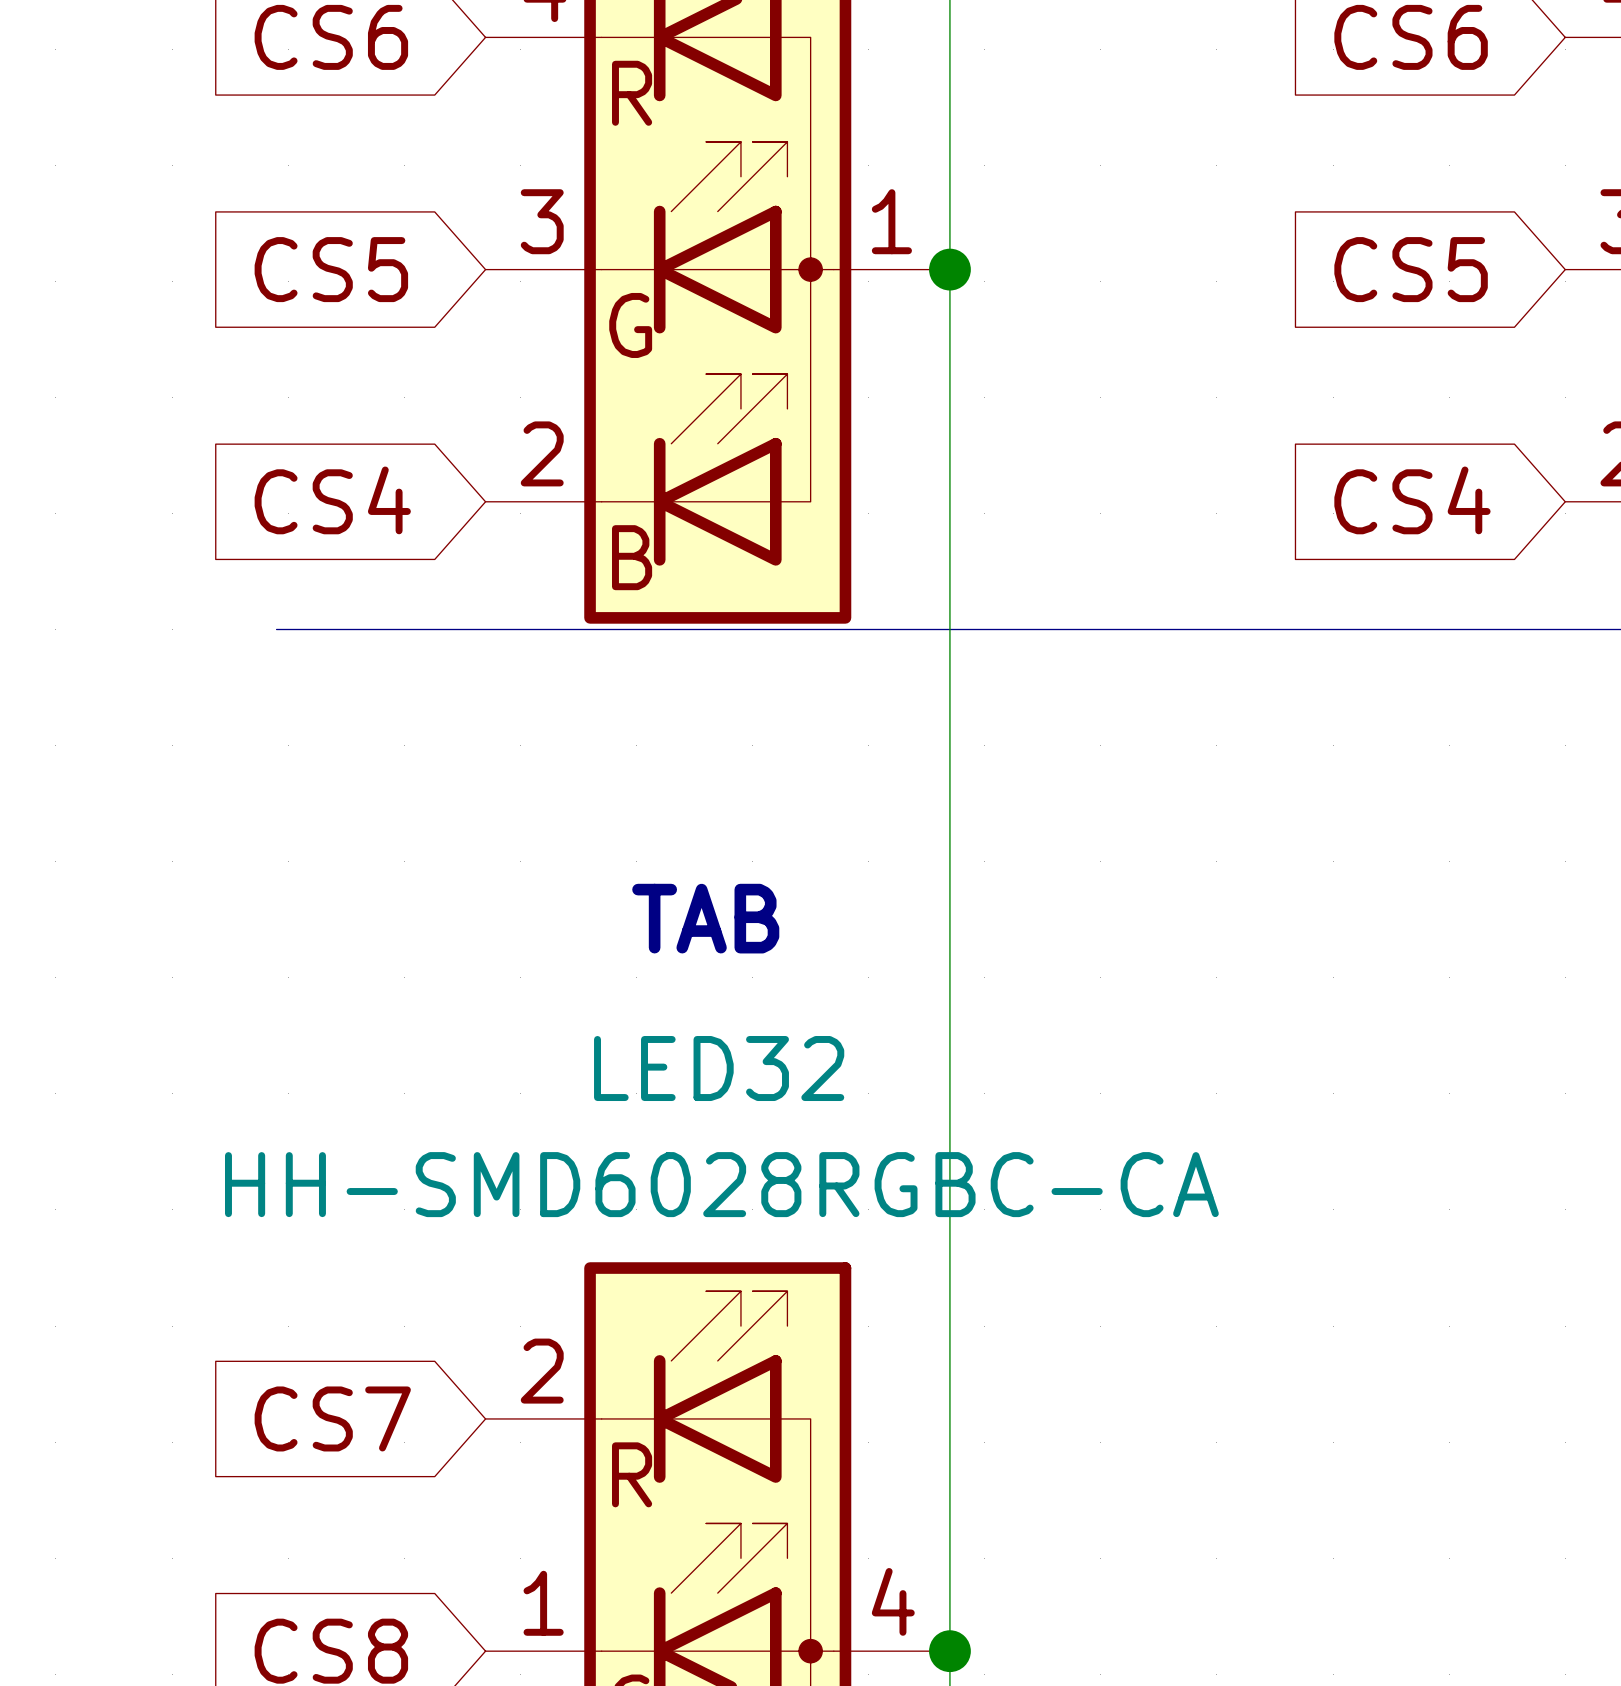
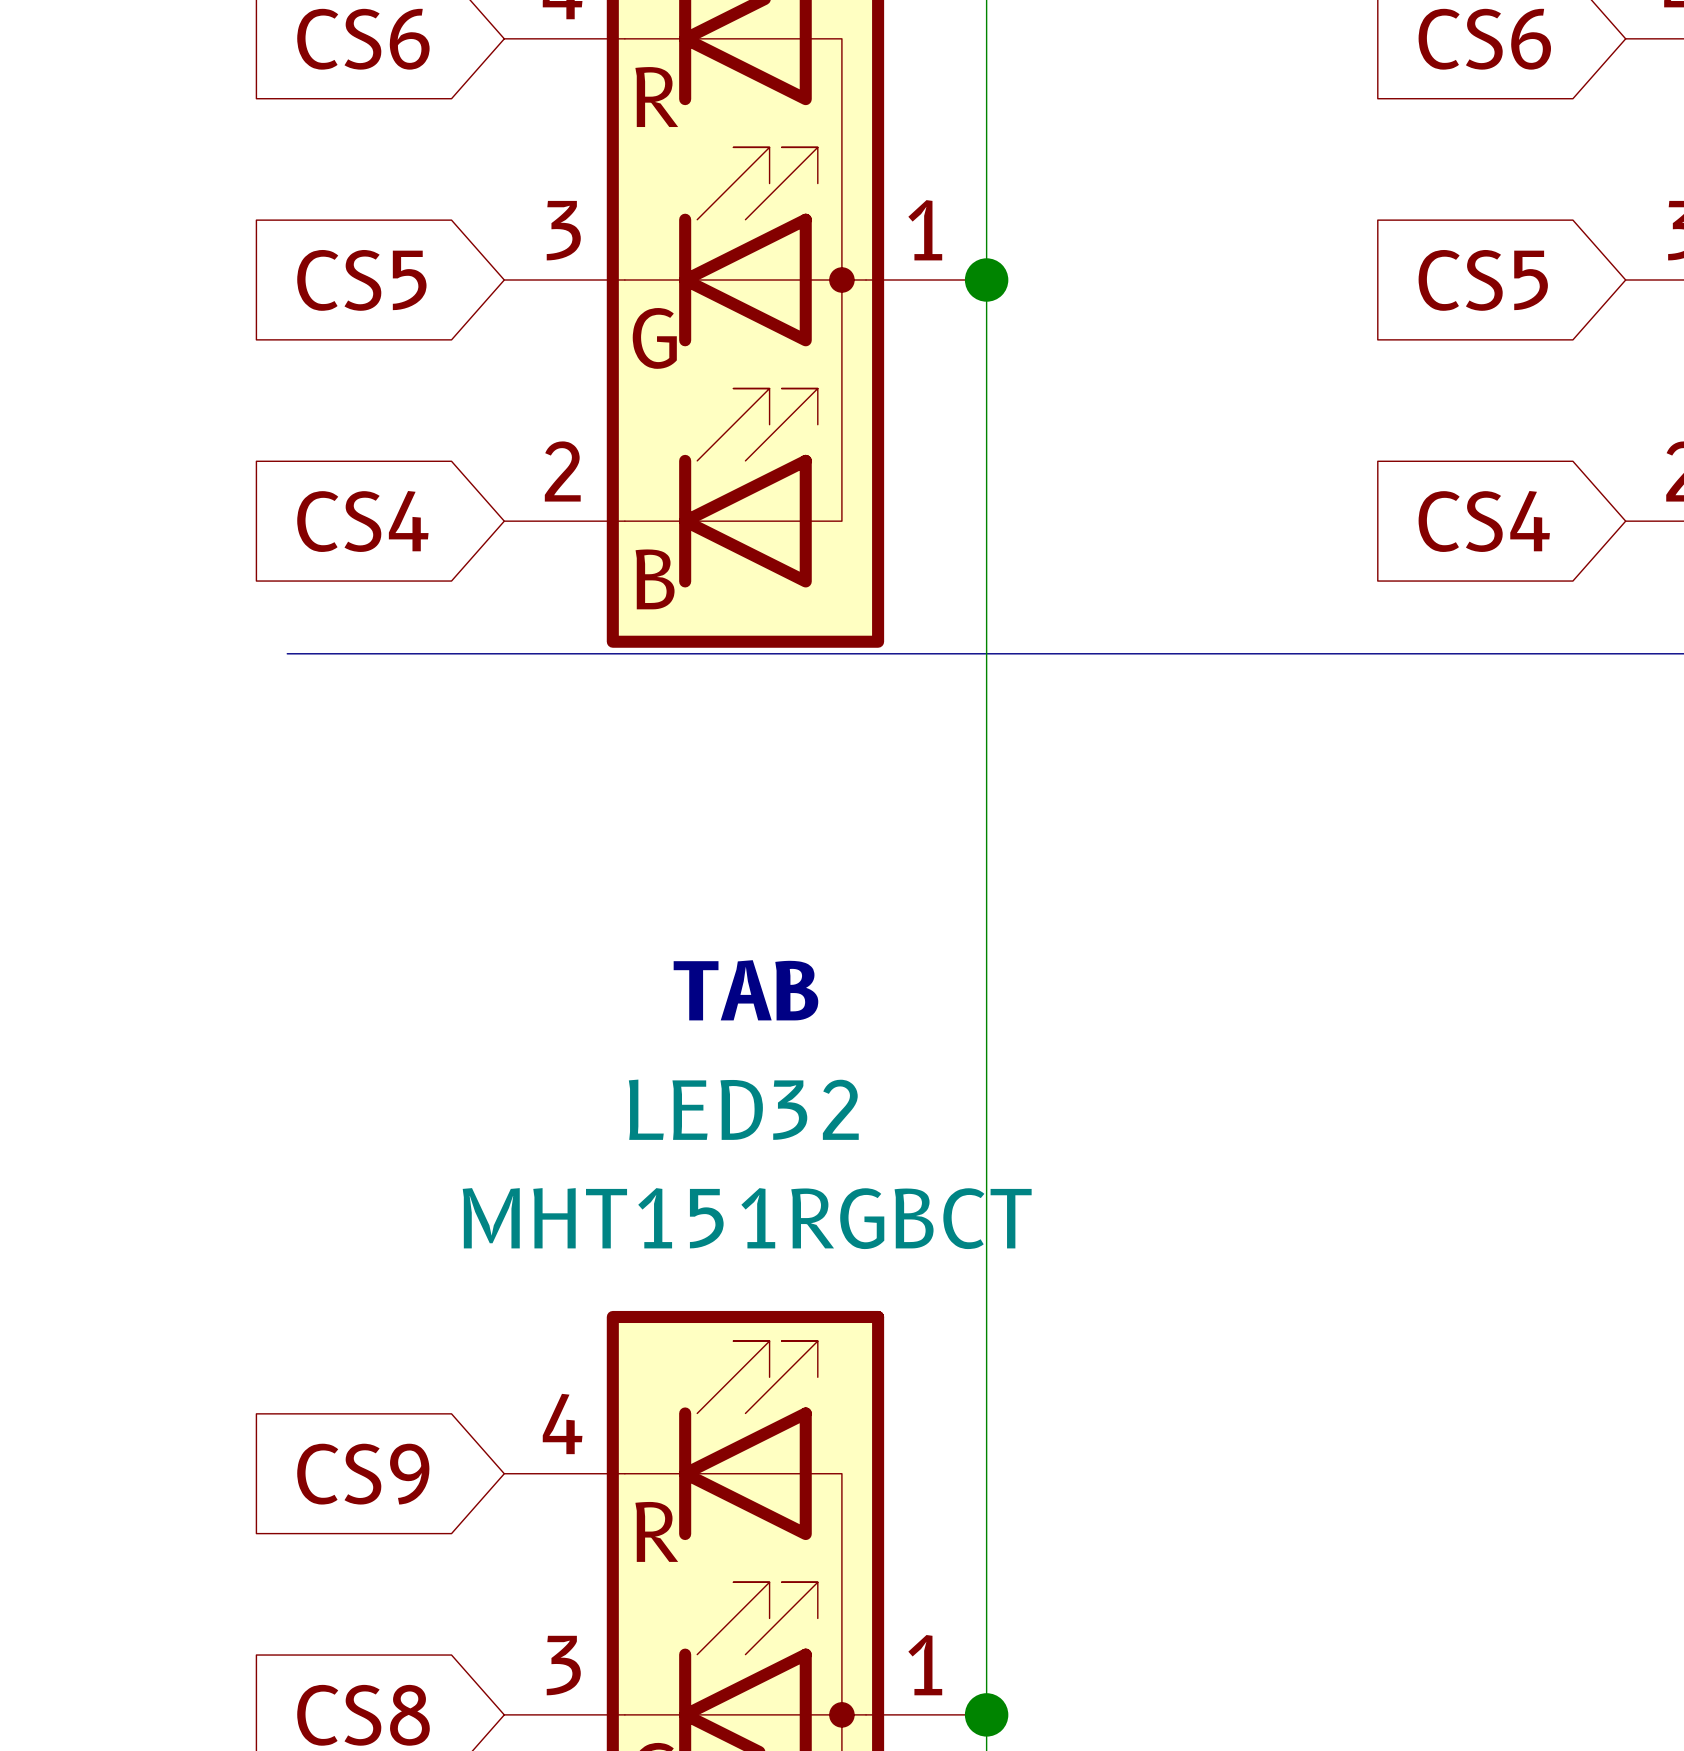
text position: TAB (705, 918) -> TAB (745, 990)
LED32 value: HH-SMD6028RGBC-CA (721, 1184) -> MHT151RGBCT (747, 1218)
LED32 pin number: 2 (542, 1371) -> 4 (562, 1424)
global label: CS7 (332, 1418) -> CS9 (363, 1474)
LED32 pin number: 4 (893, 1601) -> 1 (925, 1665)
LED32 pin number: 1 (543, 1603) -> 3 (563, 1665)

